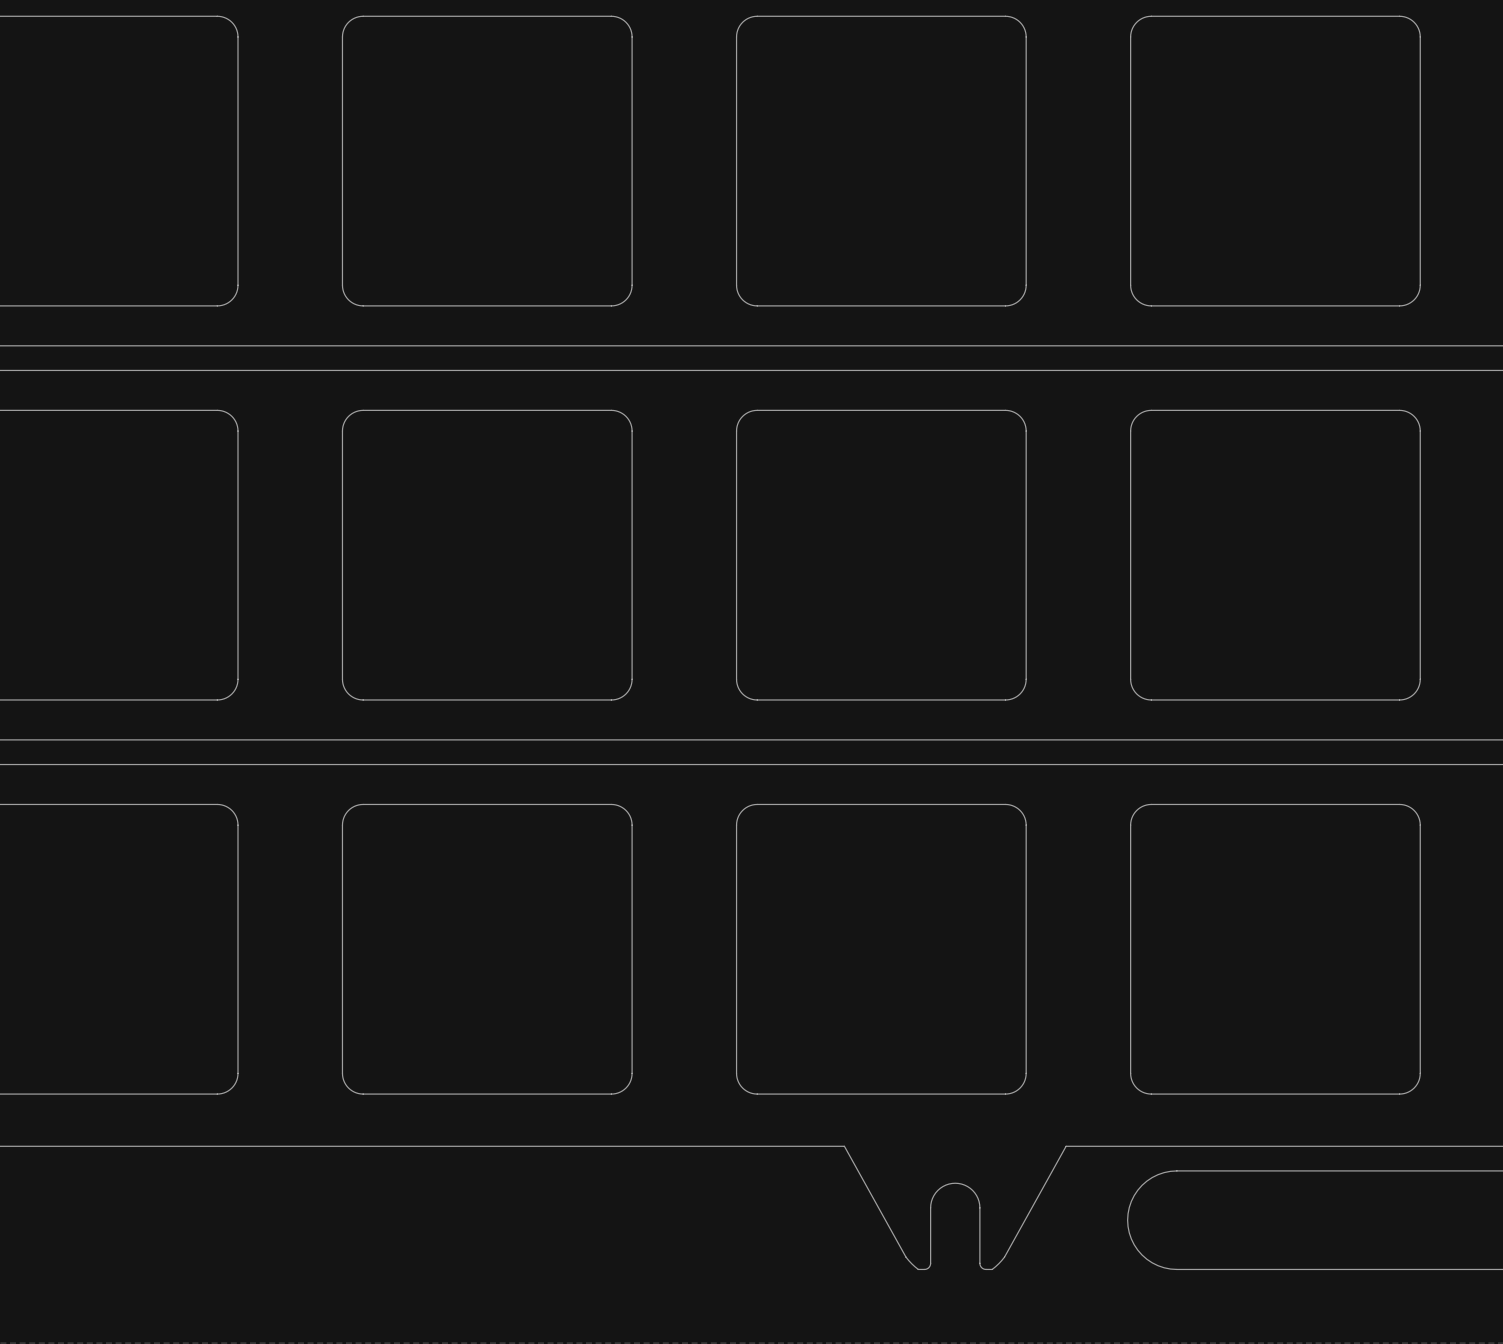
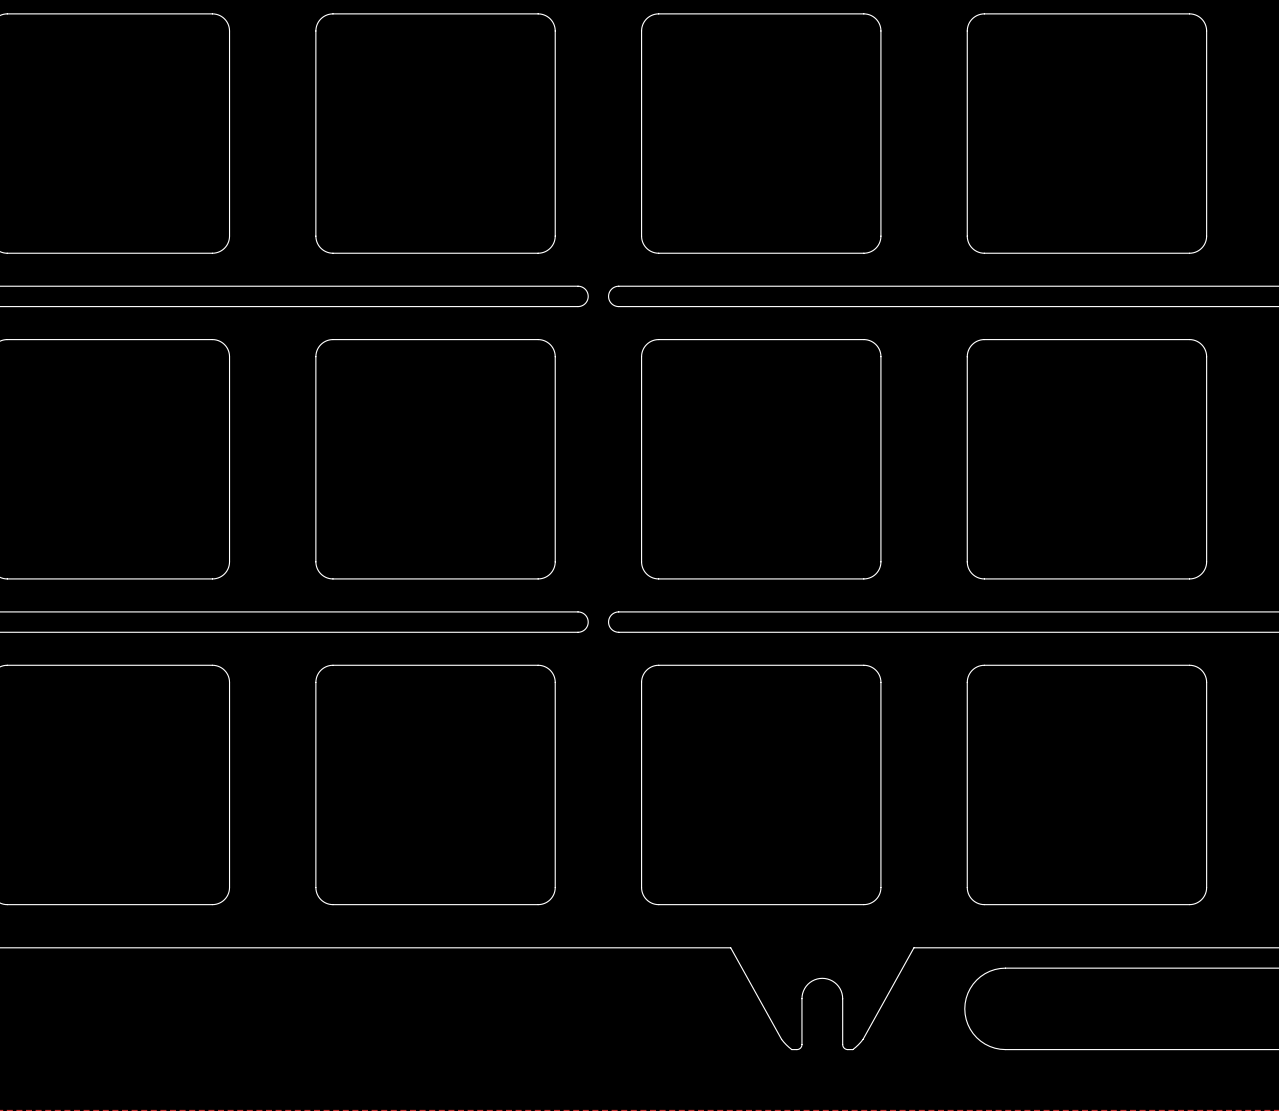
board edge: (659, 345) (708, 345) -> (578, 286) (585, 289) (588, 296) (584, 304) (578, 306)
board edge: (659, 370) (708, 370) -> (618, 286) (611, 288) (608, 296) (611, 303) (618, 306)
board edge: (659, 739) (708, 739) -> (578, 611) (585, 615) (588, 622) (584, 629) (578, 632)
board edge: (659, 764) (708, 764) -> (618, 611) (611, 615) (608, 622) (611, 628) (618, 632)

